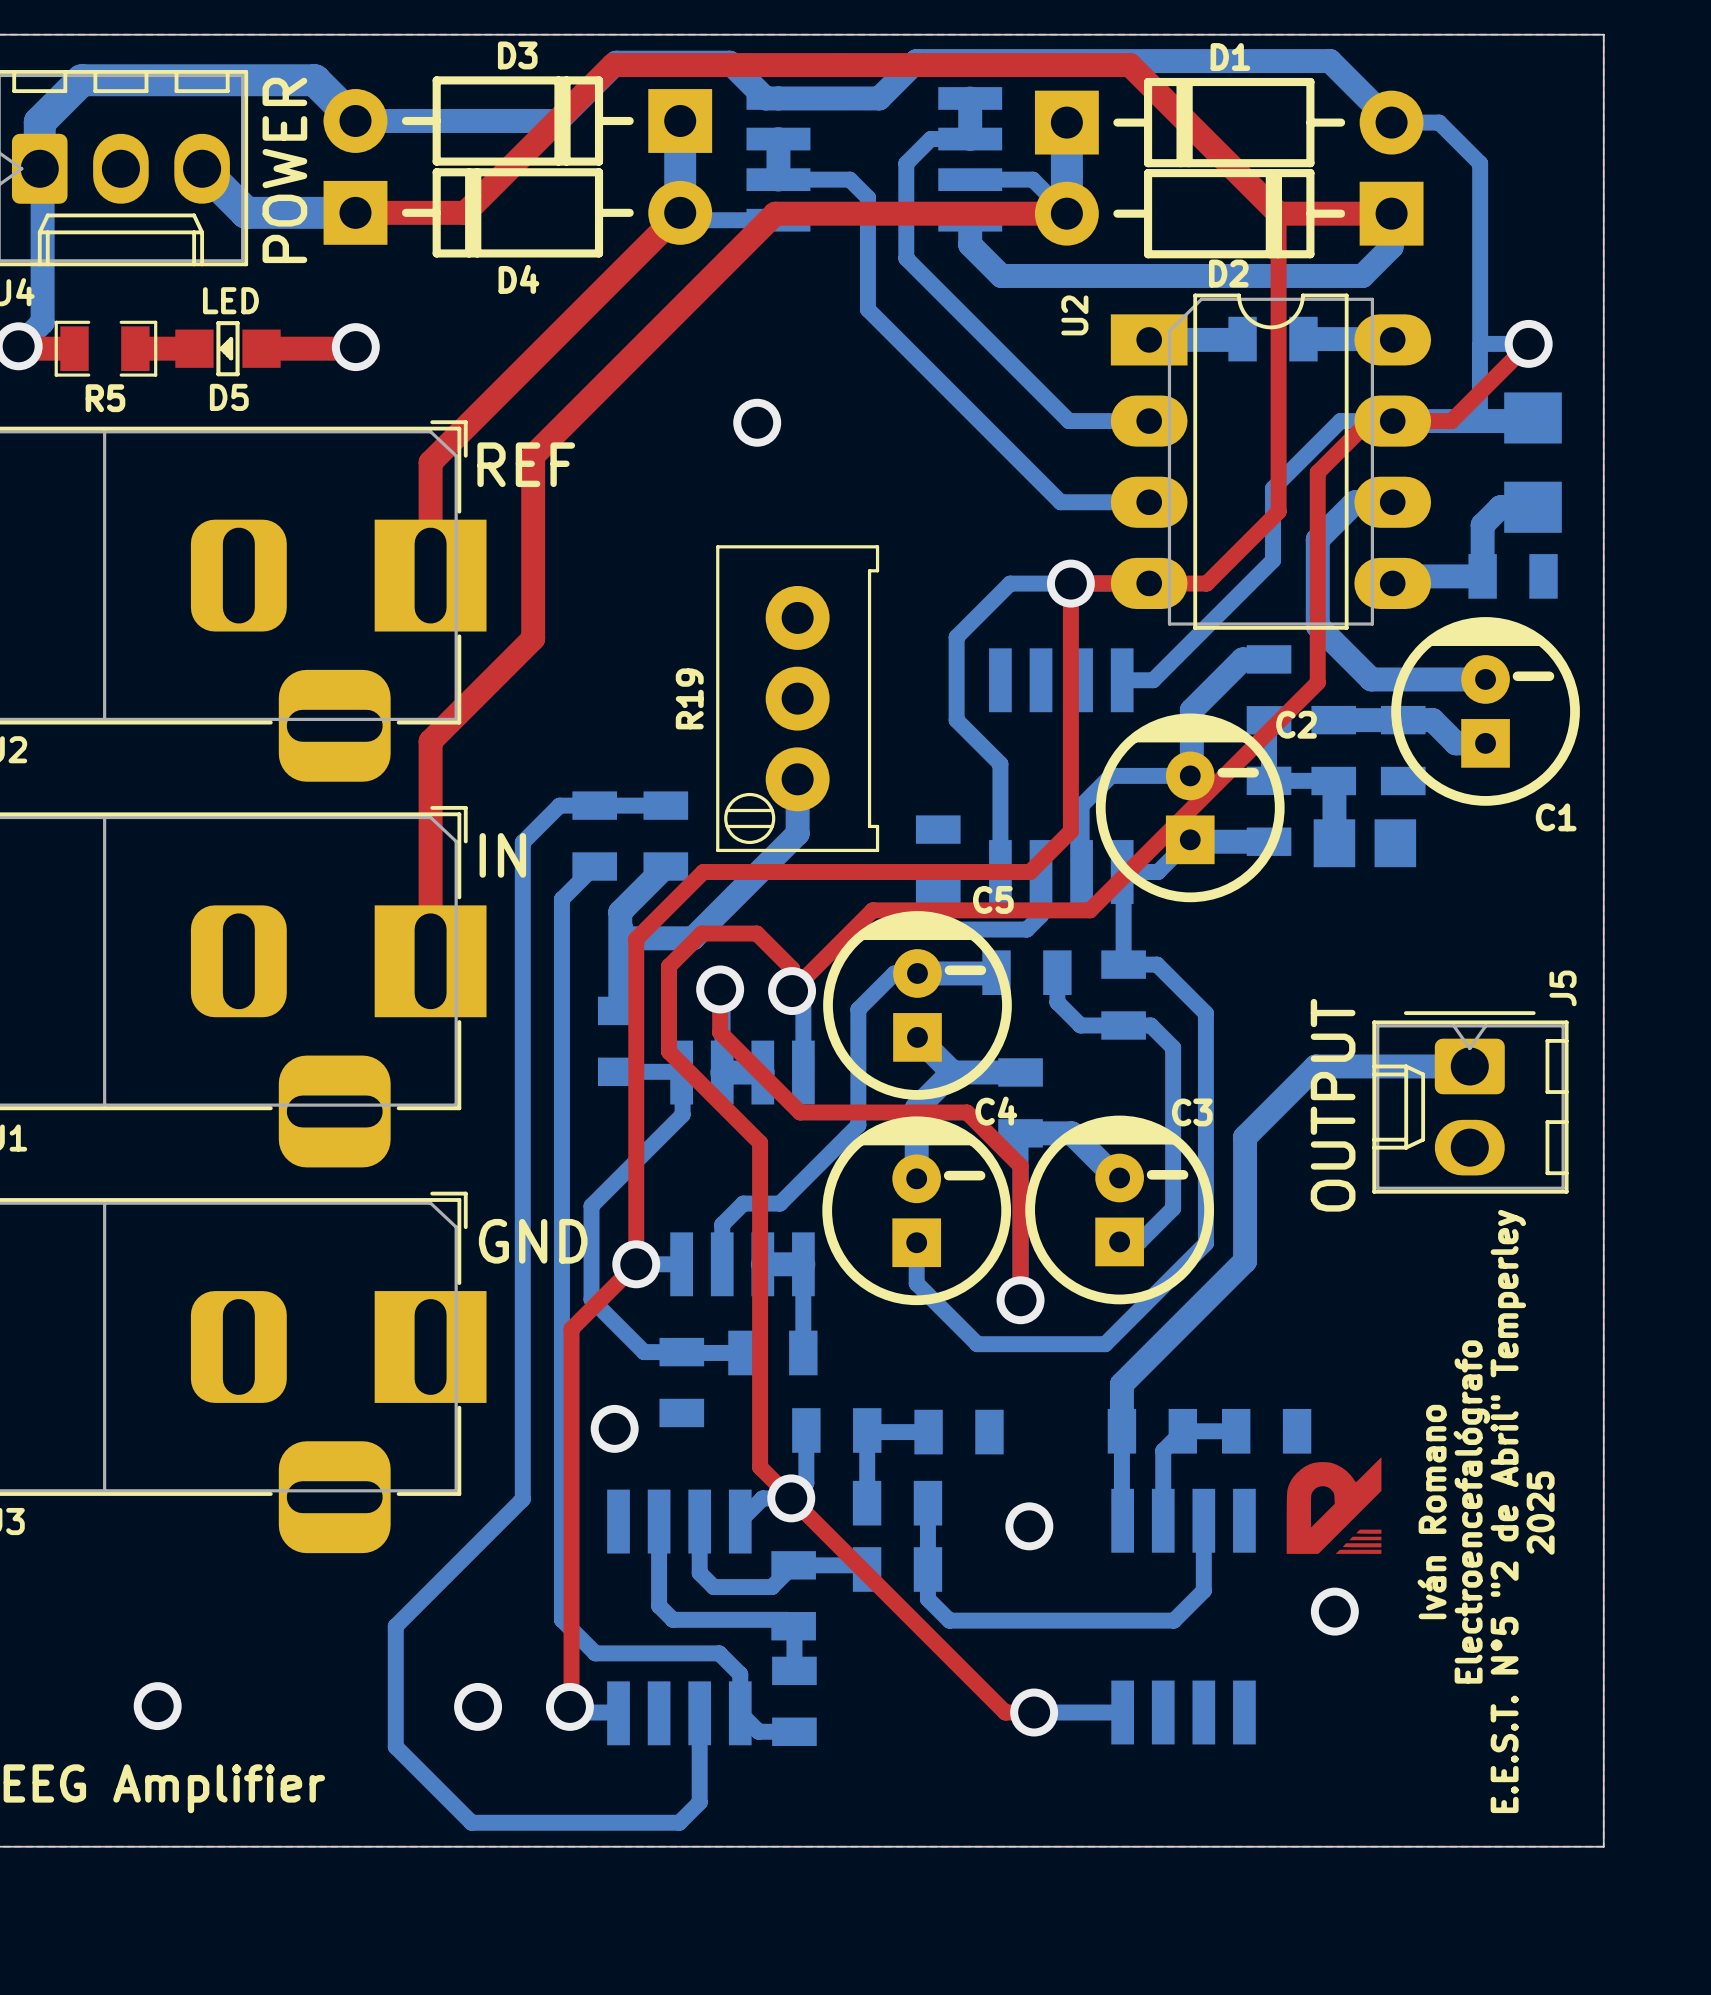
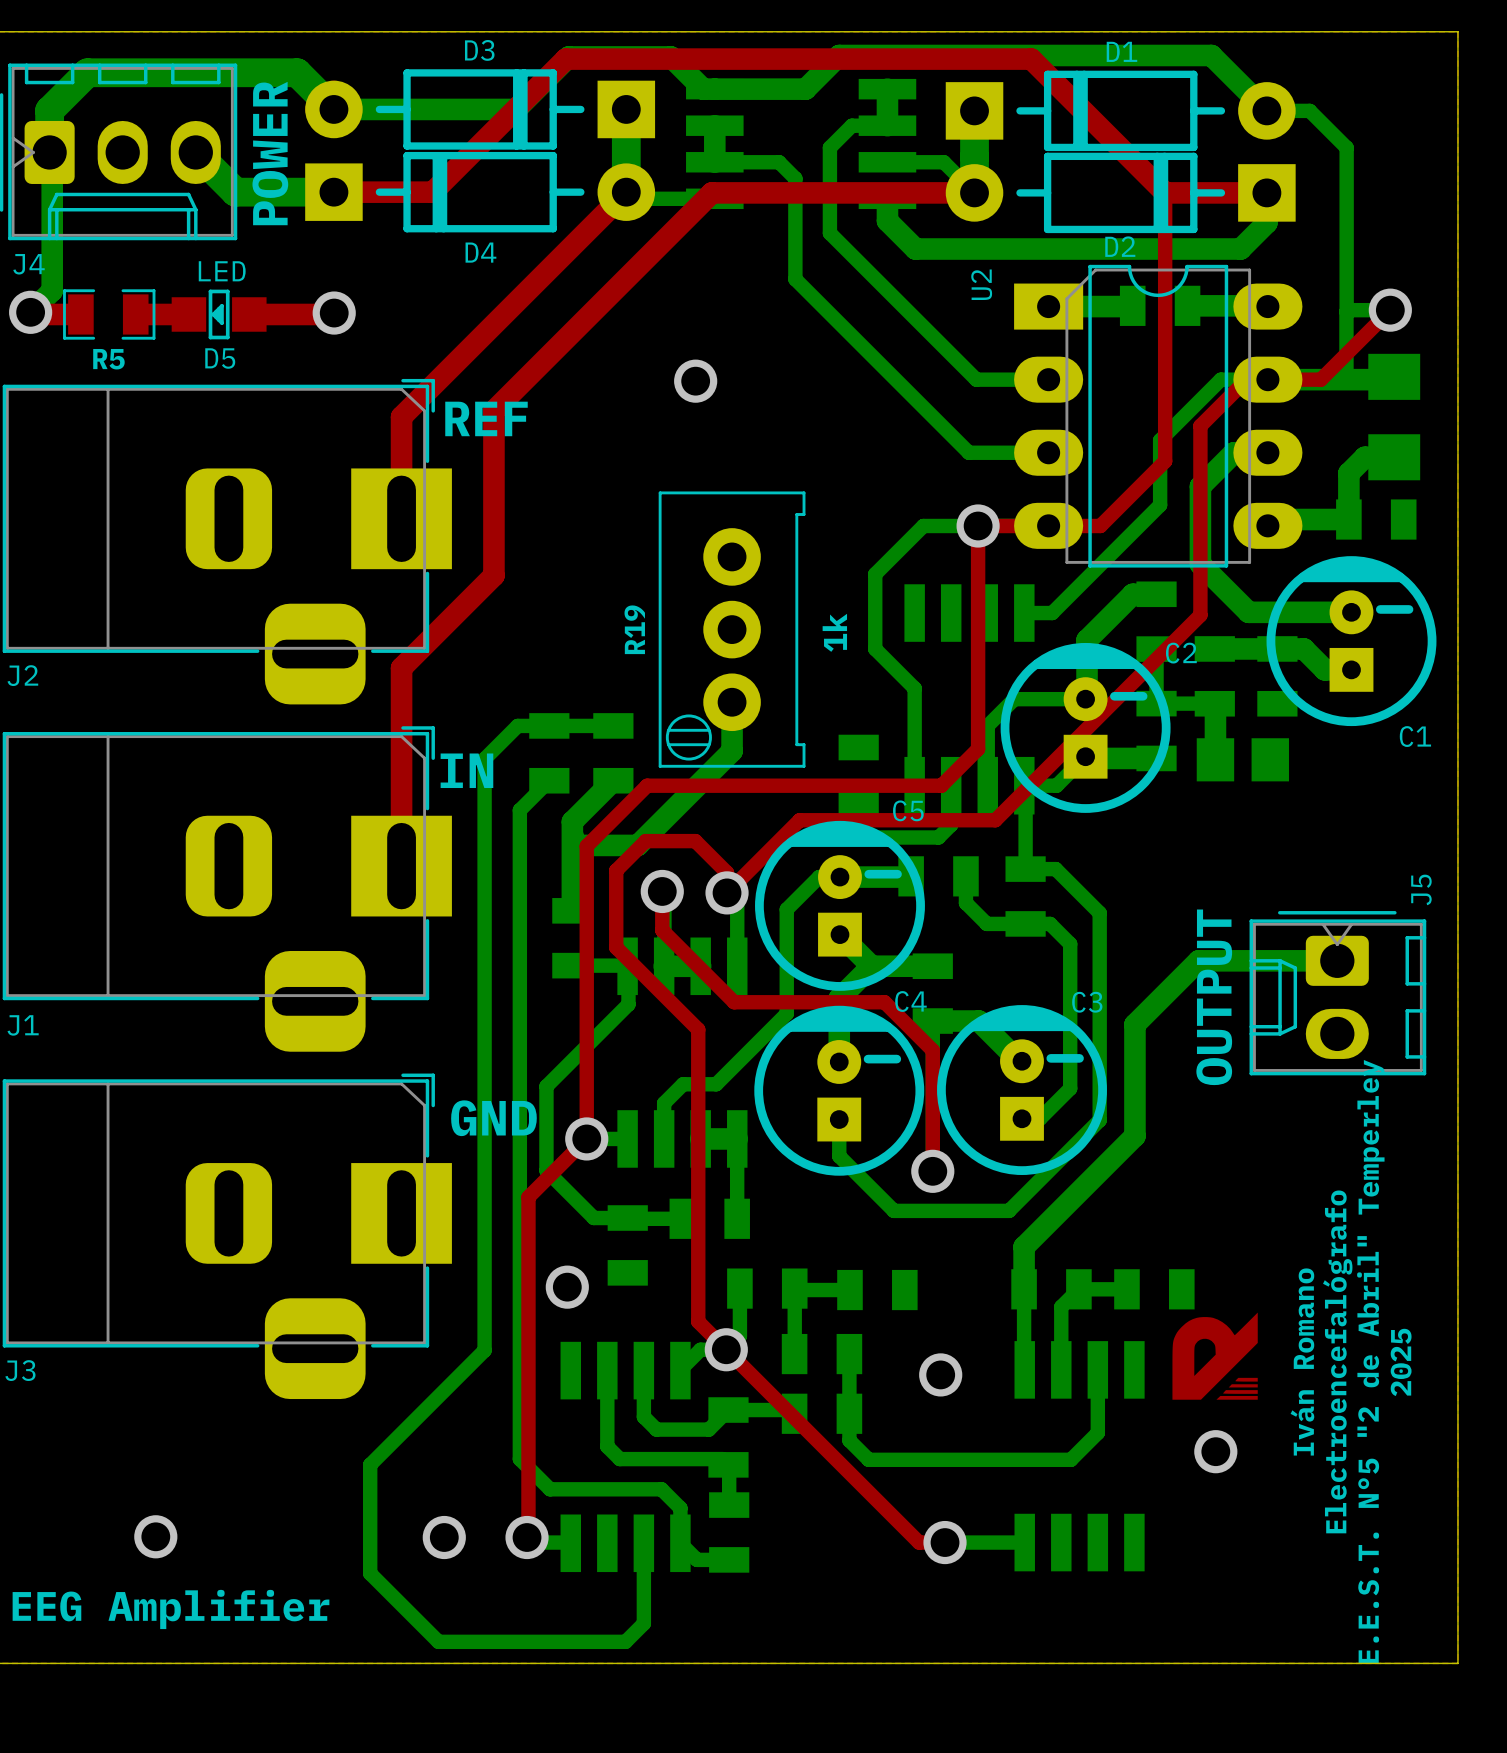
R19 value: none -> 1k (834, 632)

